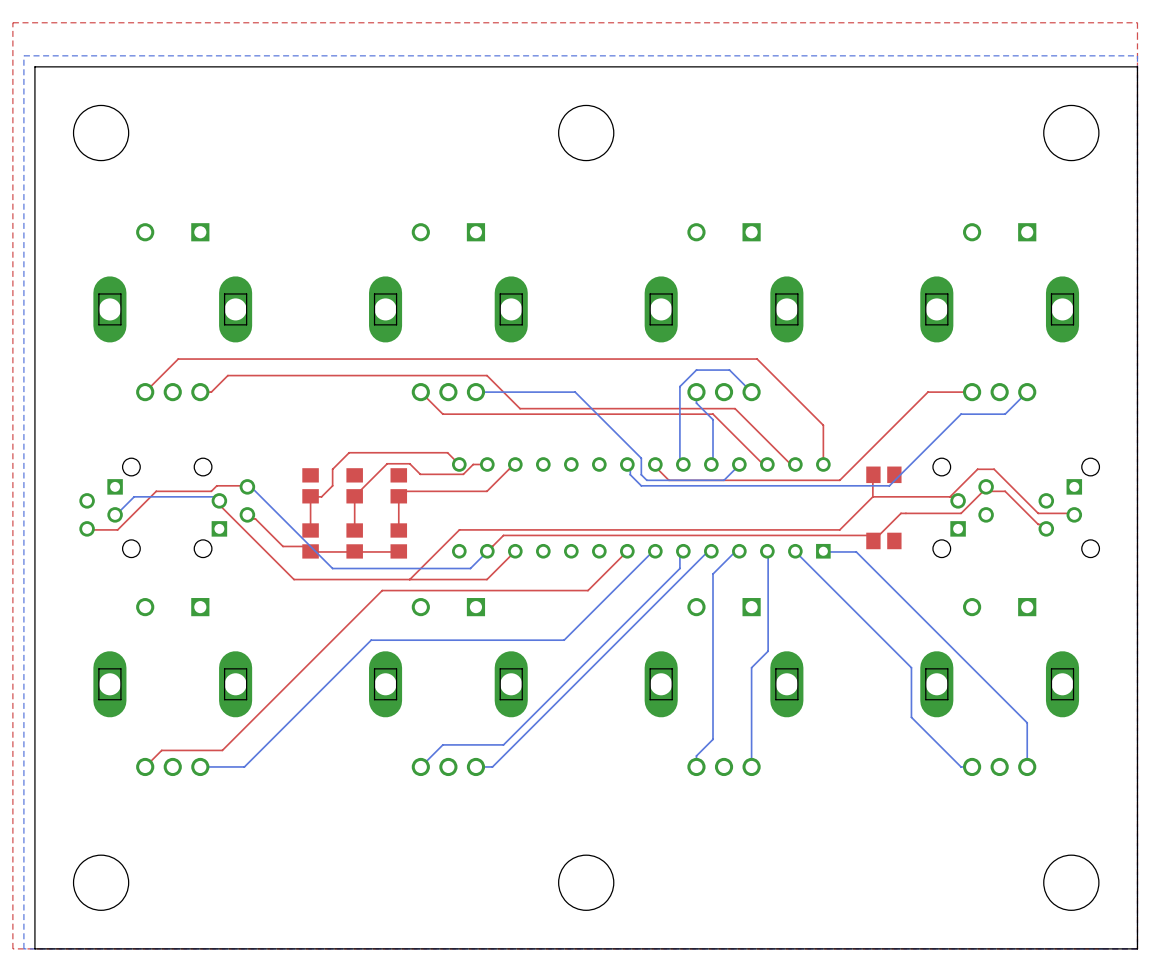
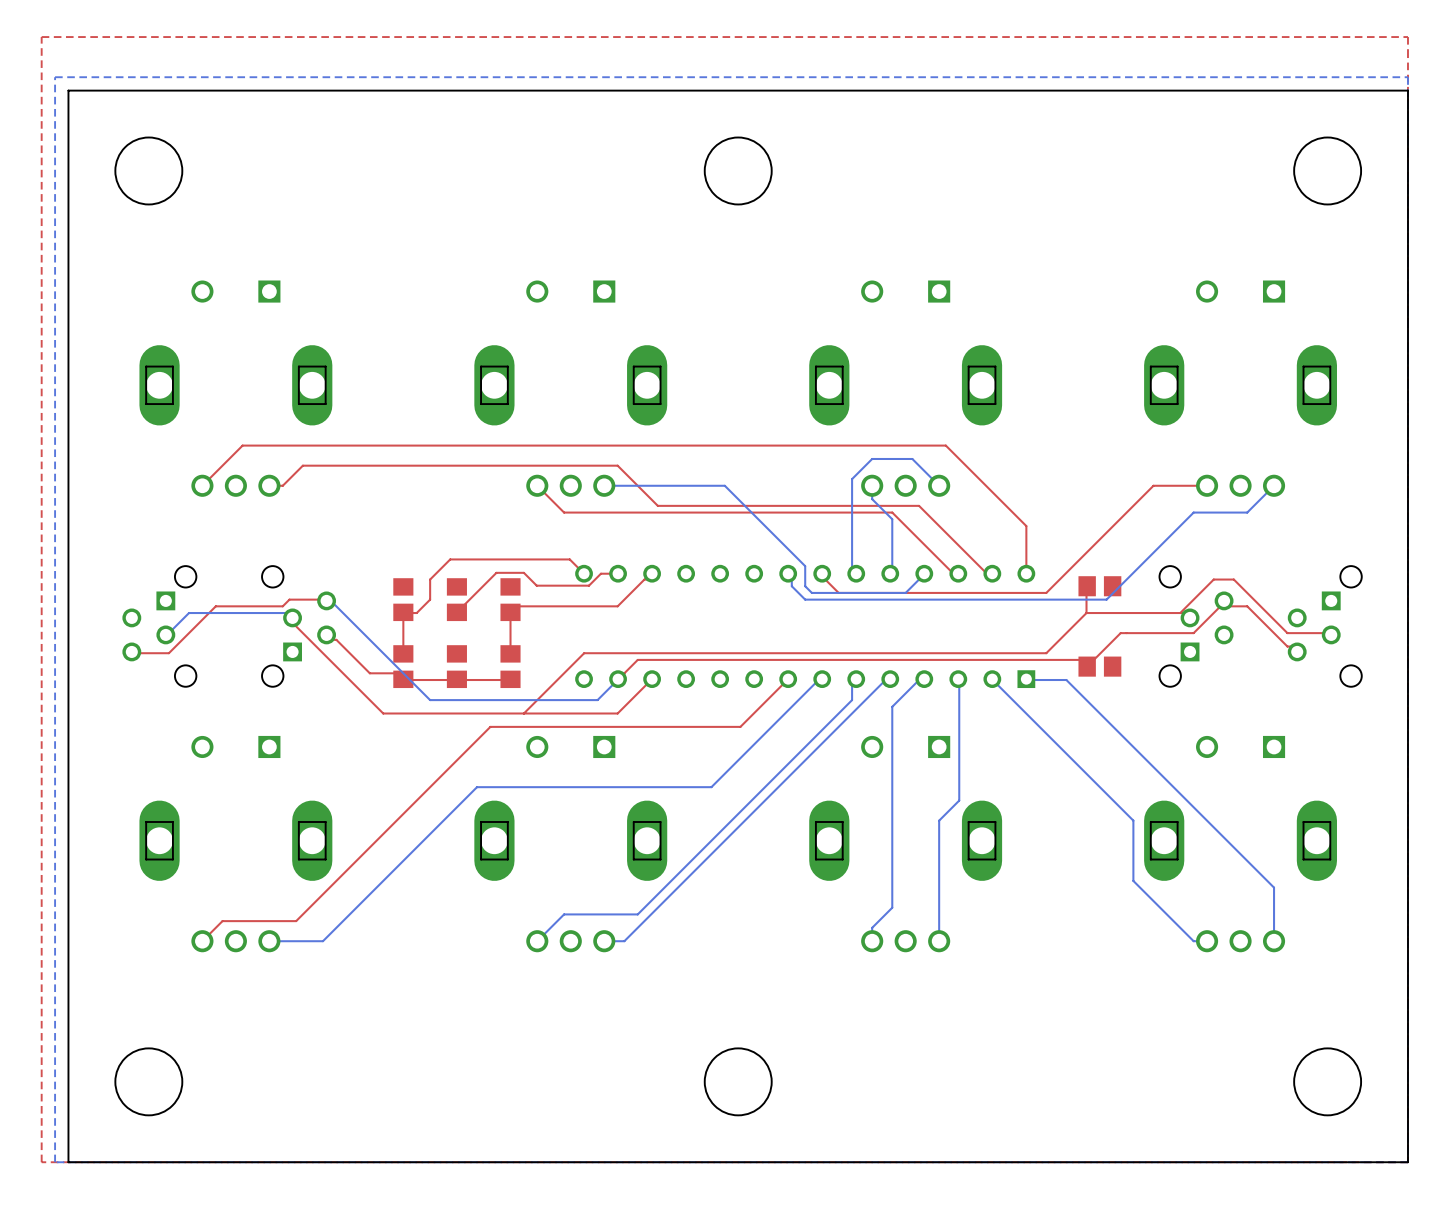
top track: (354, 496) (354, 530) -> none

